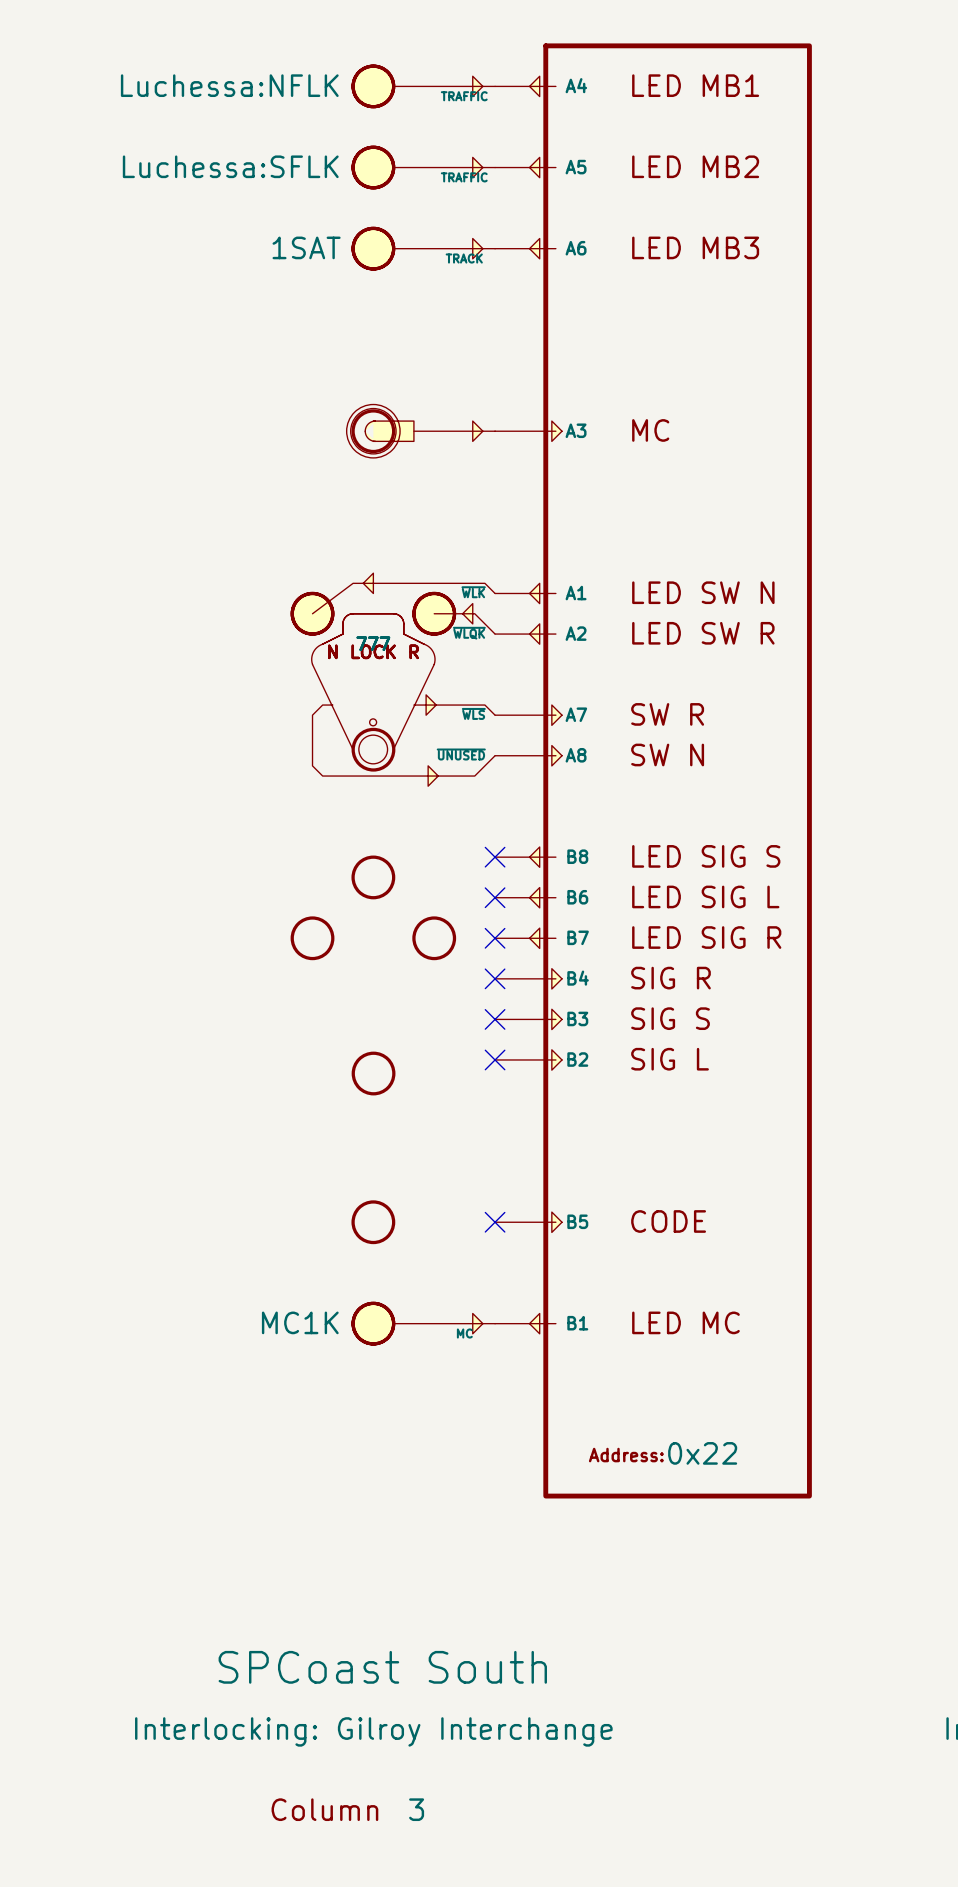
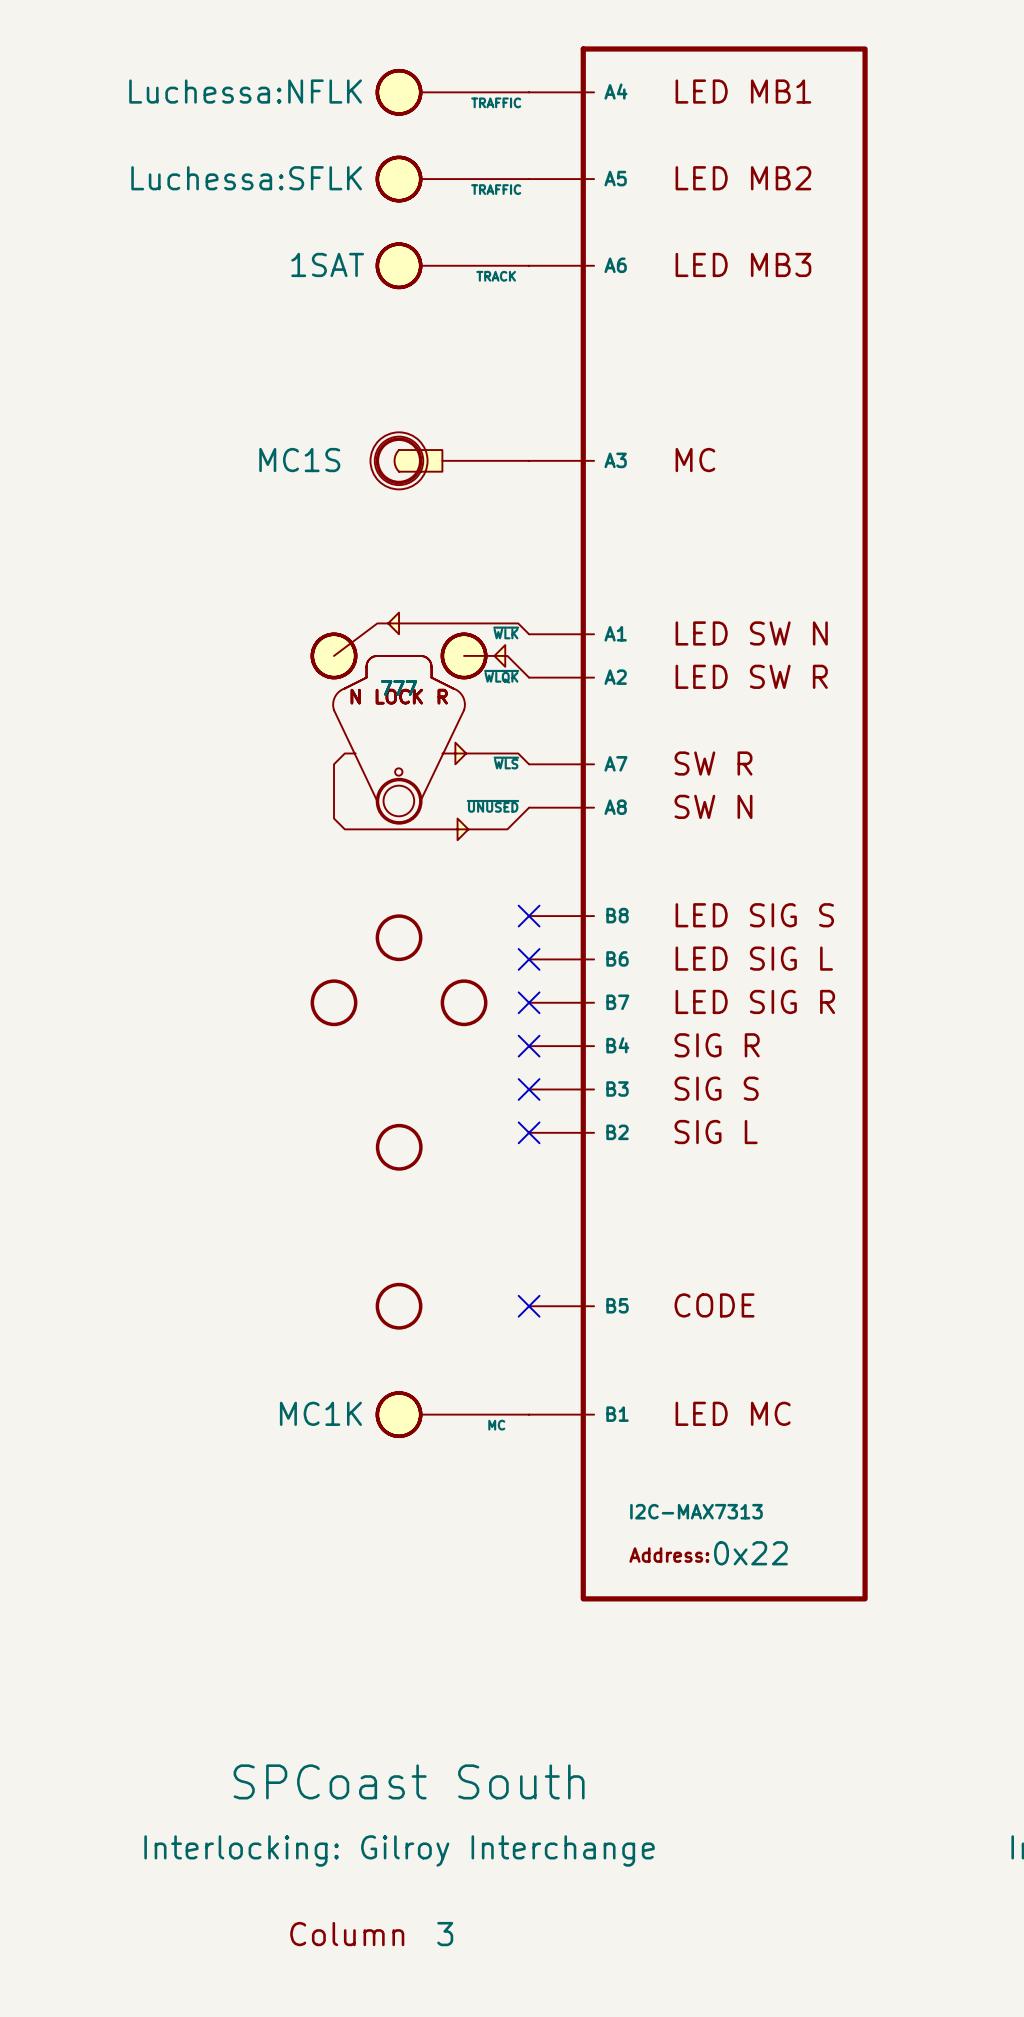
part symbol: [495, 43, 812, 1499] -> [529, 46, 868, 1602]
part symbol: [351, 64, 496, 109] -> [375, 68, 530, 116]
part symbol: [351, 145, 496, 190] -> [375, 155, 530, 203]
part symbol: [351, 226, 496, 271] -> [375, 242, 530, 290]
part symbol: [346, 404, 496, 458] -> [370, 432, 530, 490]
part text: none -> MC1S (299, 460)
part symbol: [351, 1301, 496, 1346] -> [375, 1391, 530, 1439]
part text: none -> I2C-MAX7313 (696, 1511)

